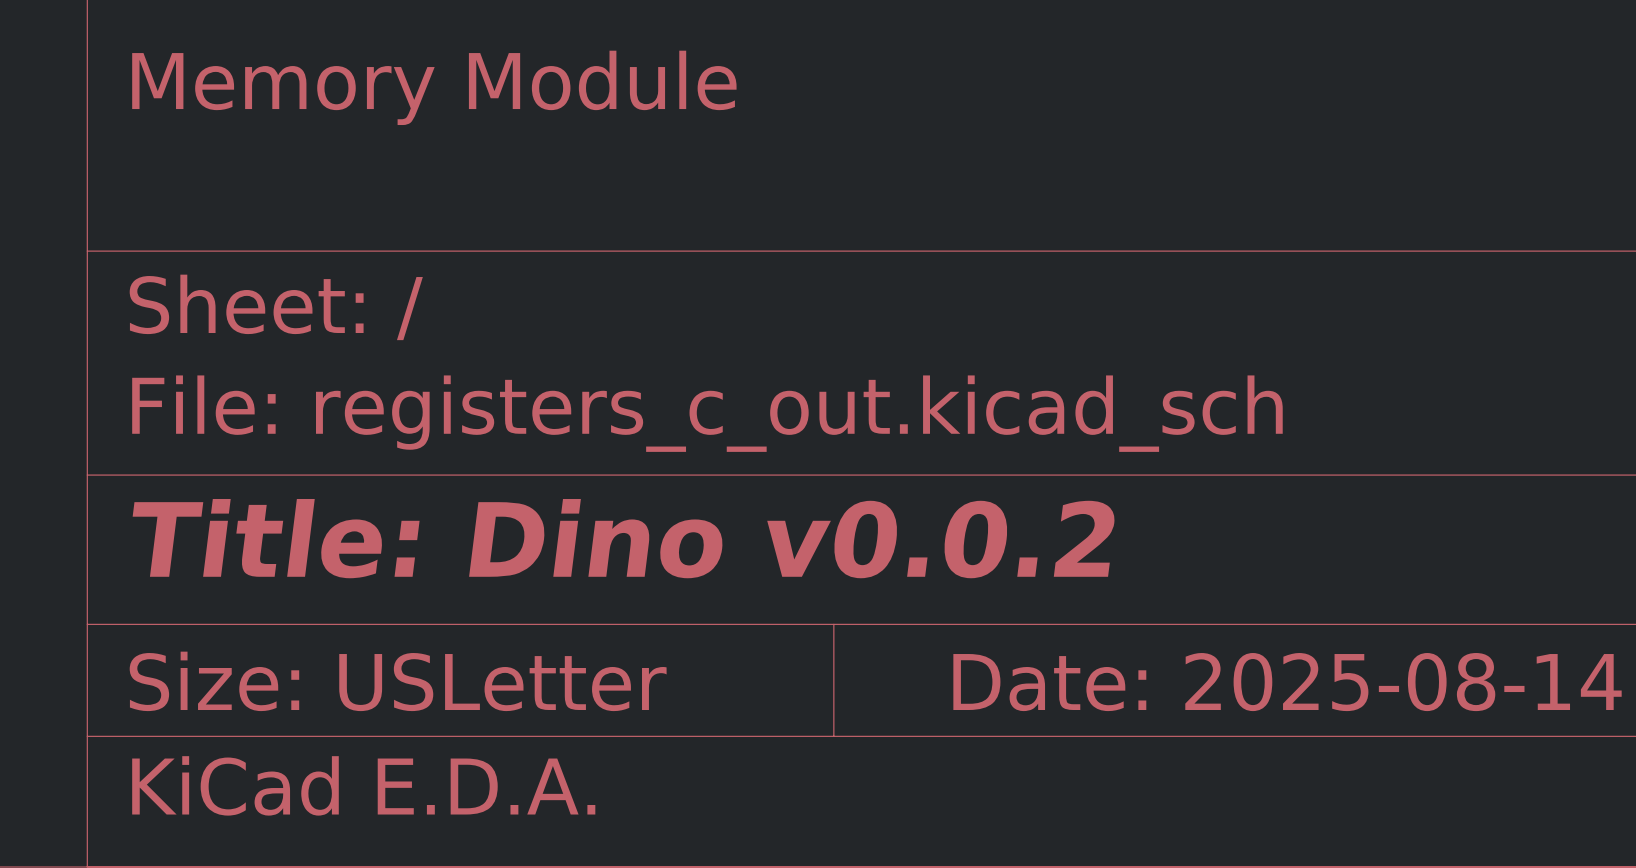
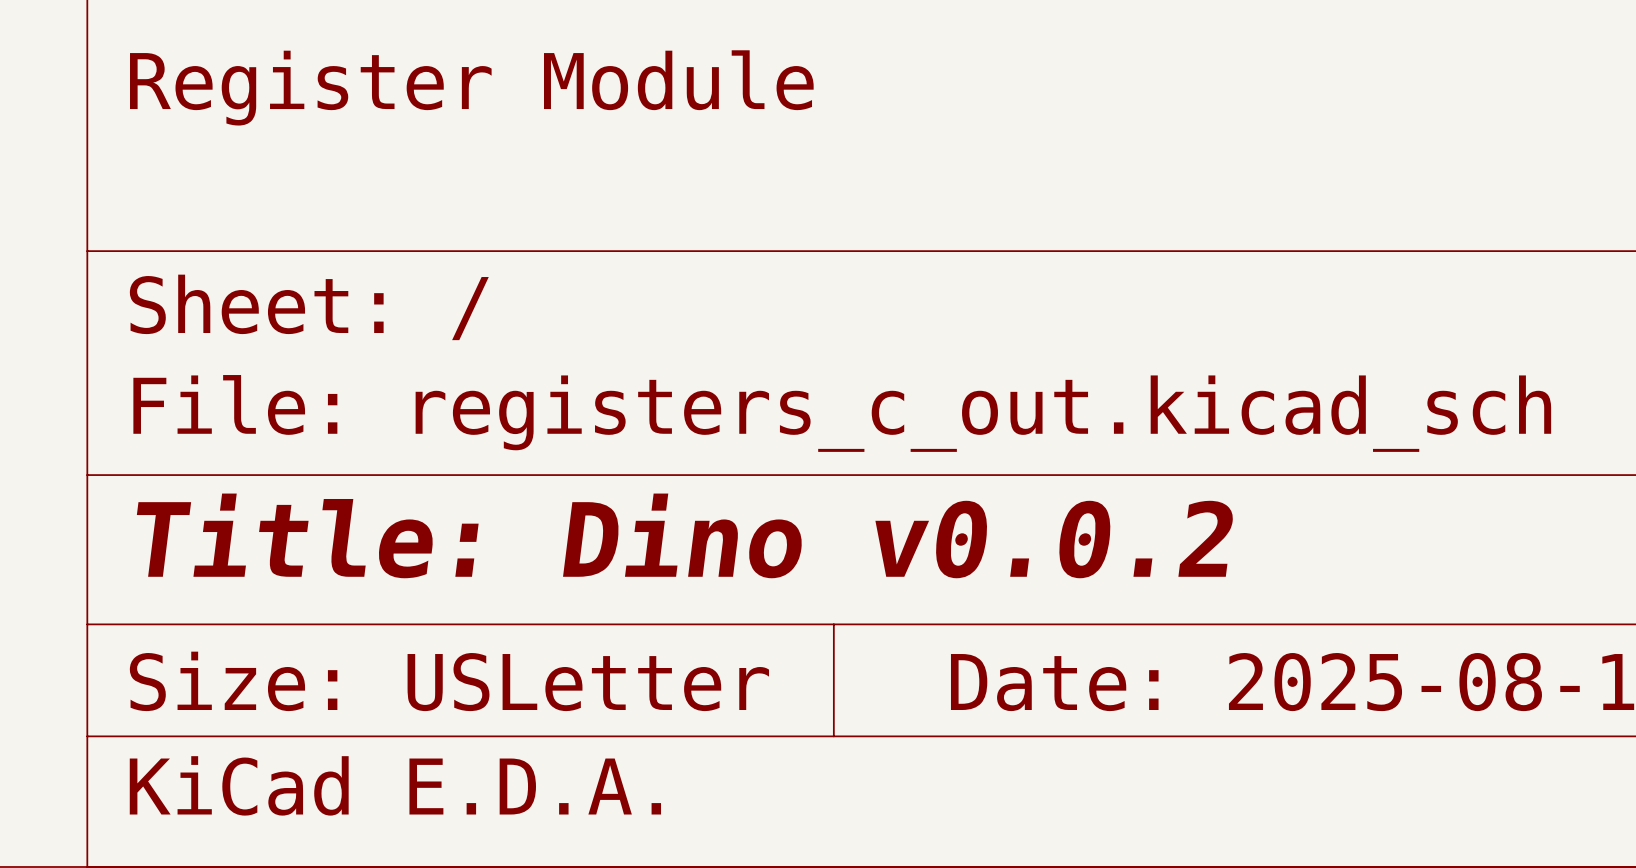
title block: Memory Module (434, 87) -> Register Module (471, 87)

